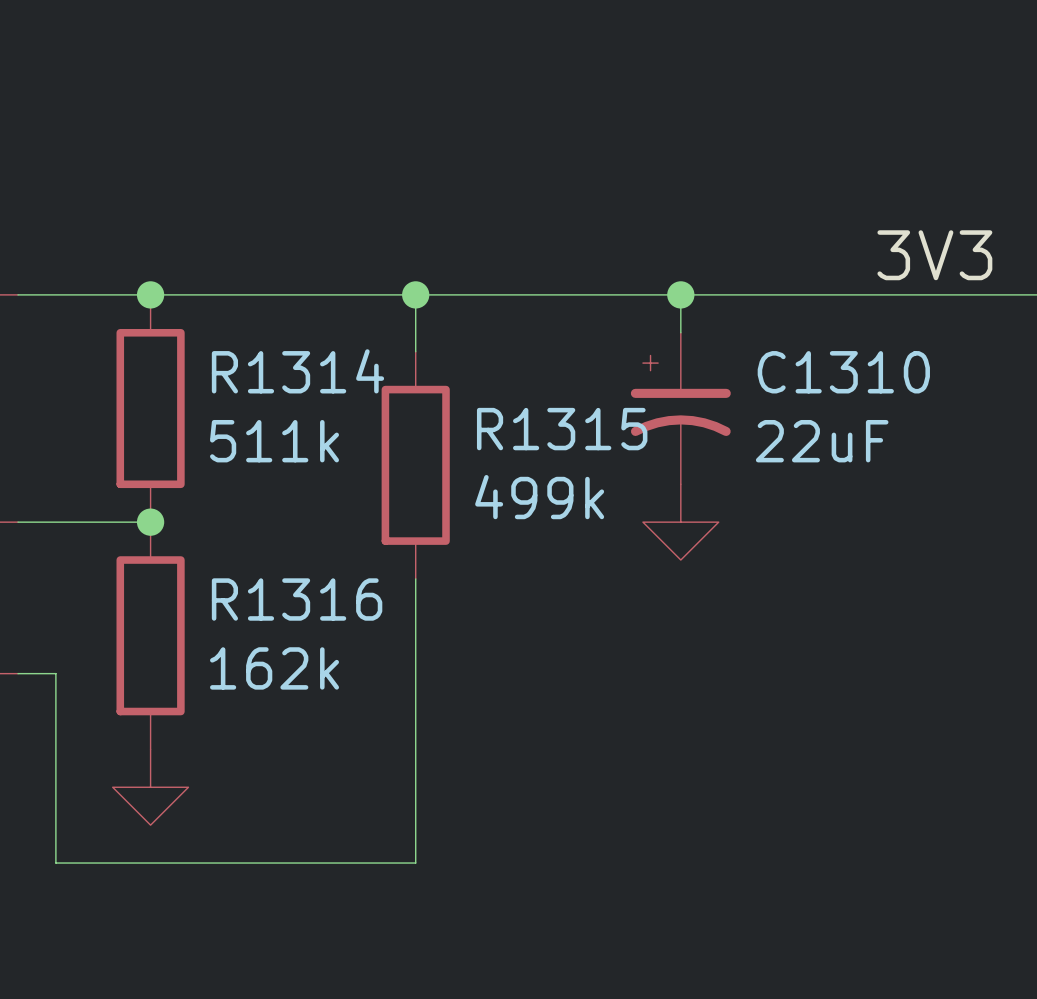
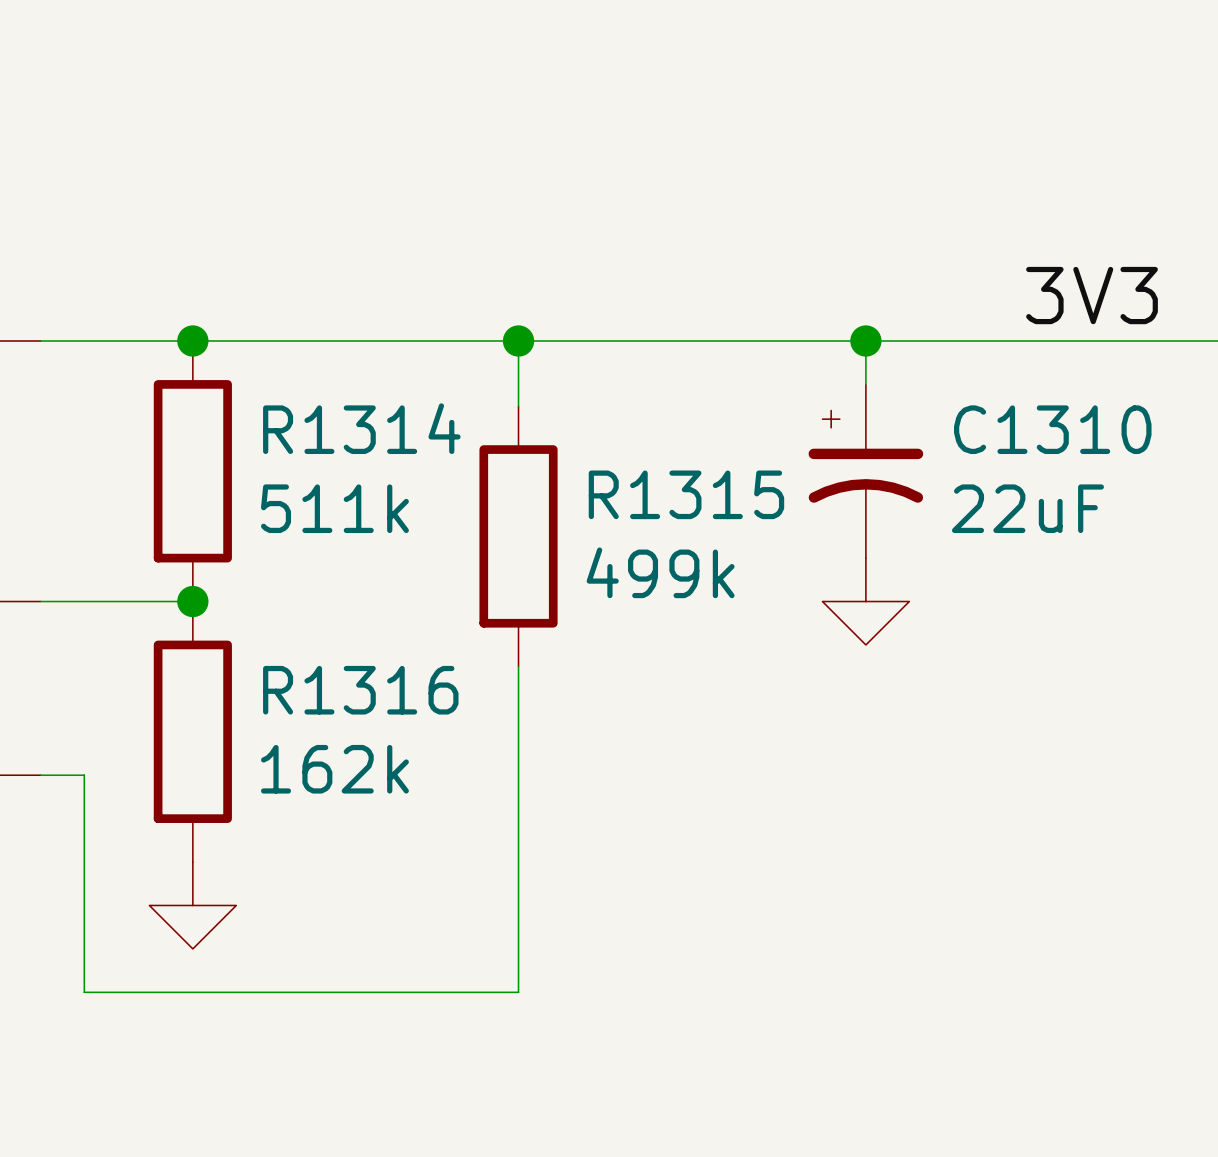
wire: (415, 294) (415, 351) -> (518, 341) (518, 406)
junction position: (415, 294) -> (518, 341)
wire: (680, 294) (680, 332) -> (865, 341) (865, 384)
junction position: (680, 294) -> (865, 341)
C1310 position: (680, 408) -> (865, 471)
R1315 position: (415, 465) -> (518, 536)
power symbol position: (680, 522) -> (865, 601)
wire: (415, 578) (415, 863) -> (518, 666) (518, 992) (496, 992)

